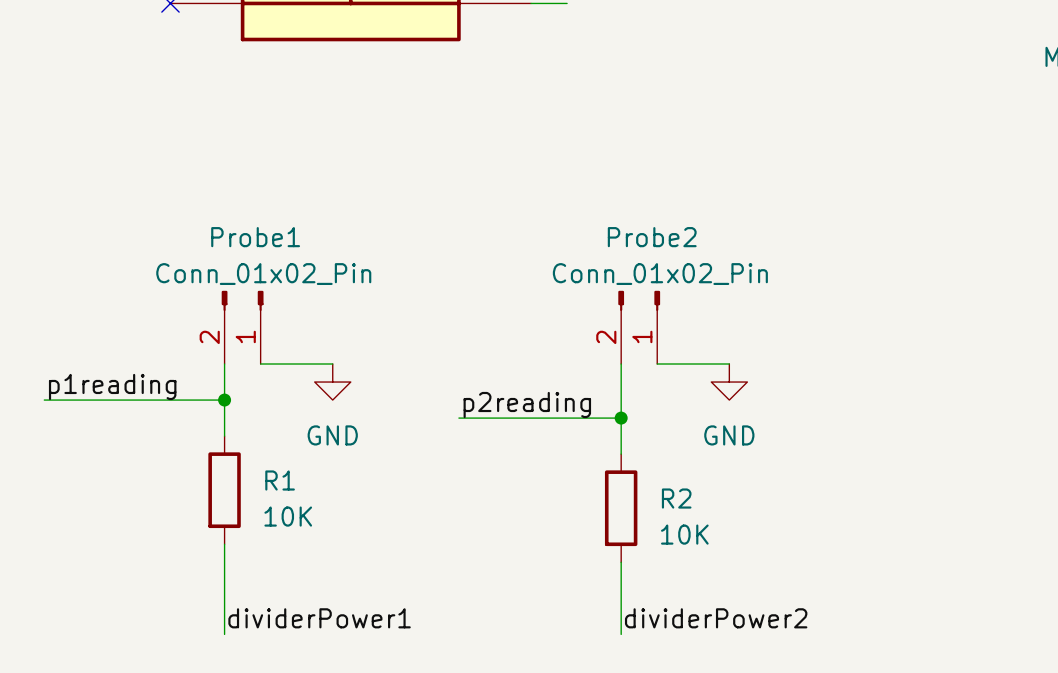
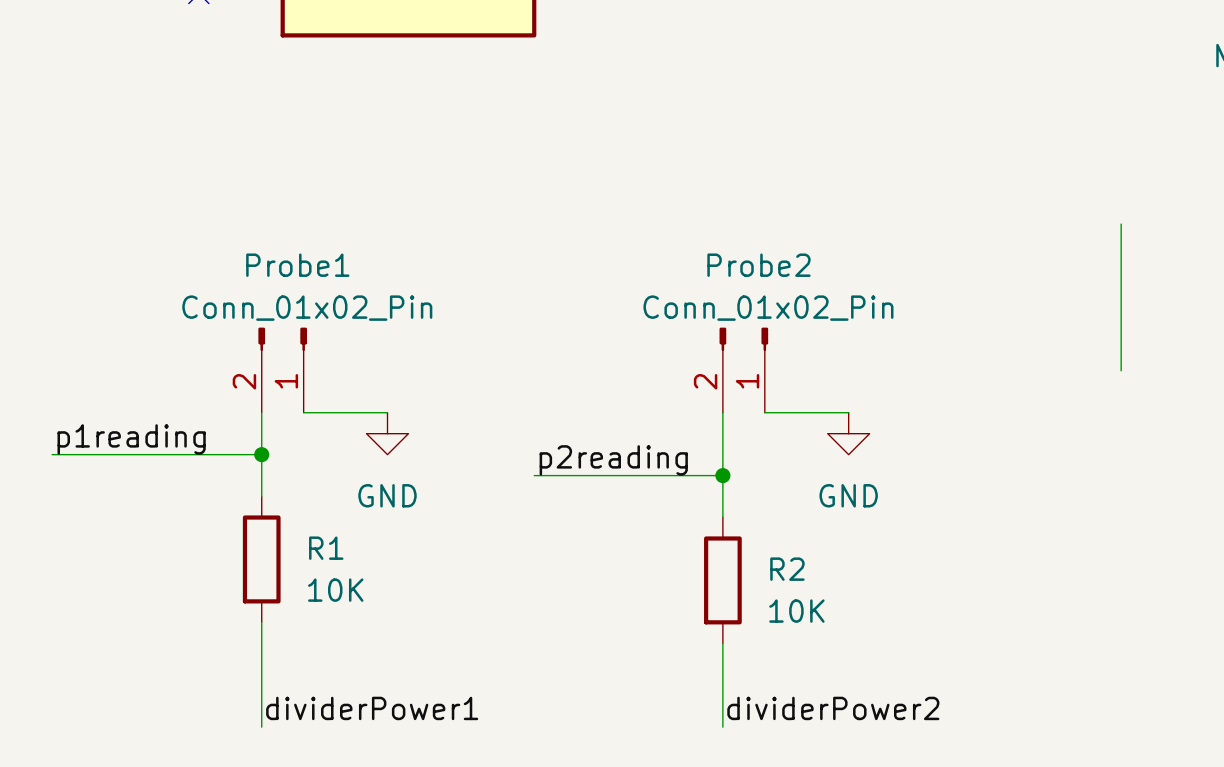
wire: none -> (1121, 224) (1121, 370)

